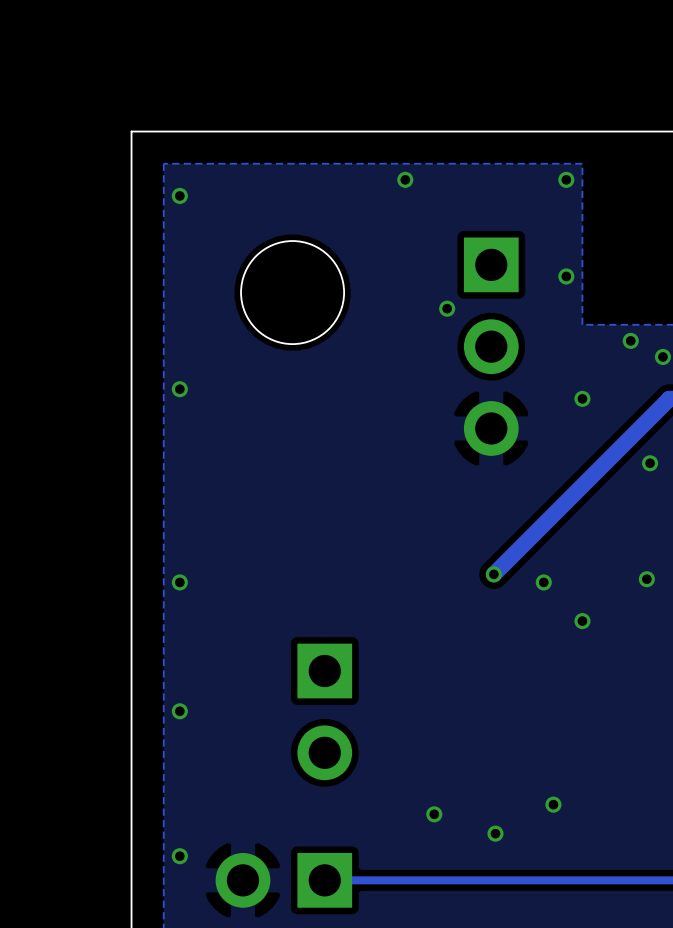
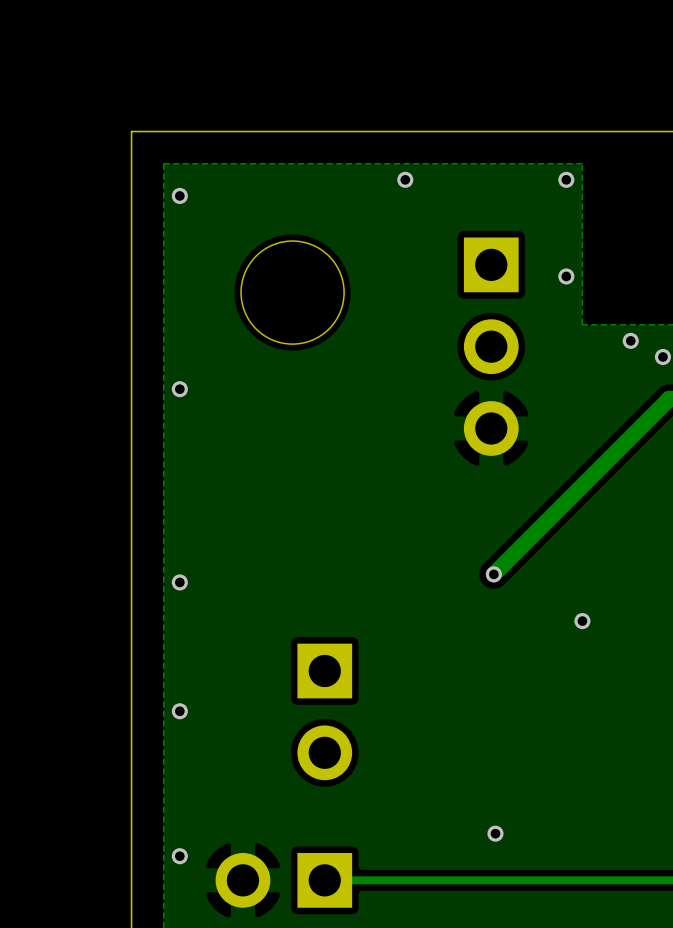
via: (447, 308) -> none
via: (582, 398) -> none
via: (650, 463) -> none
via: (646, 579) -> none
via: (543, 582) -> none
via: (553, 804) -> none
via: (434, 814) -> none

